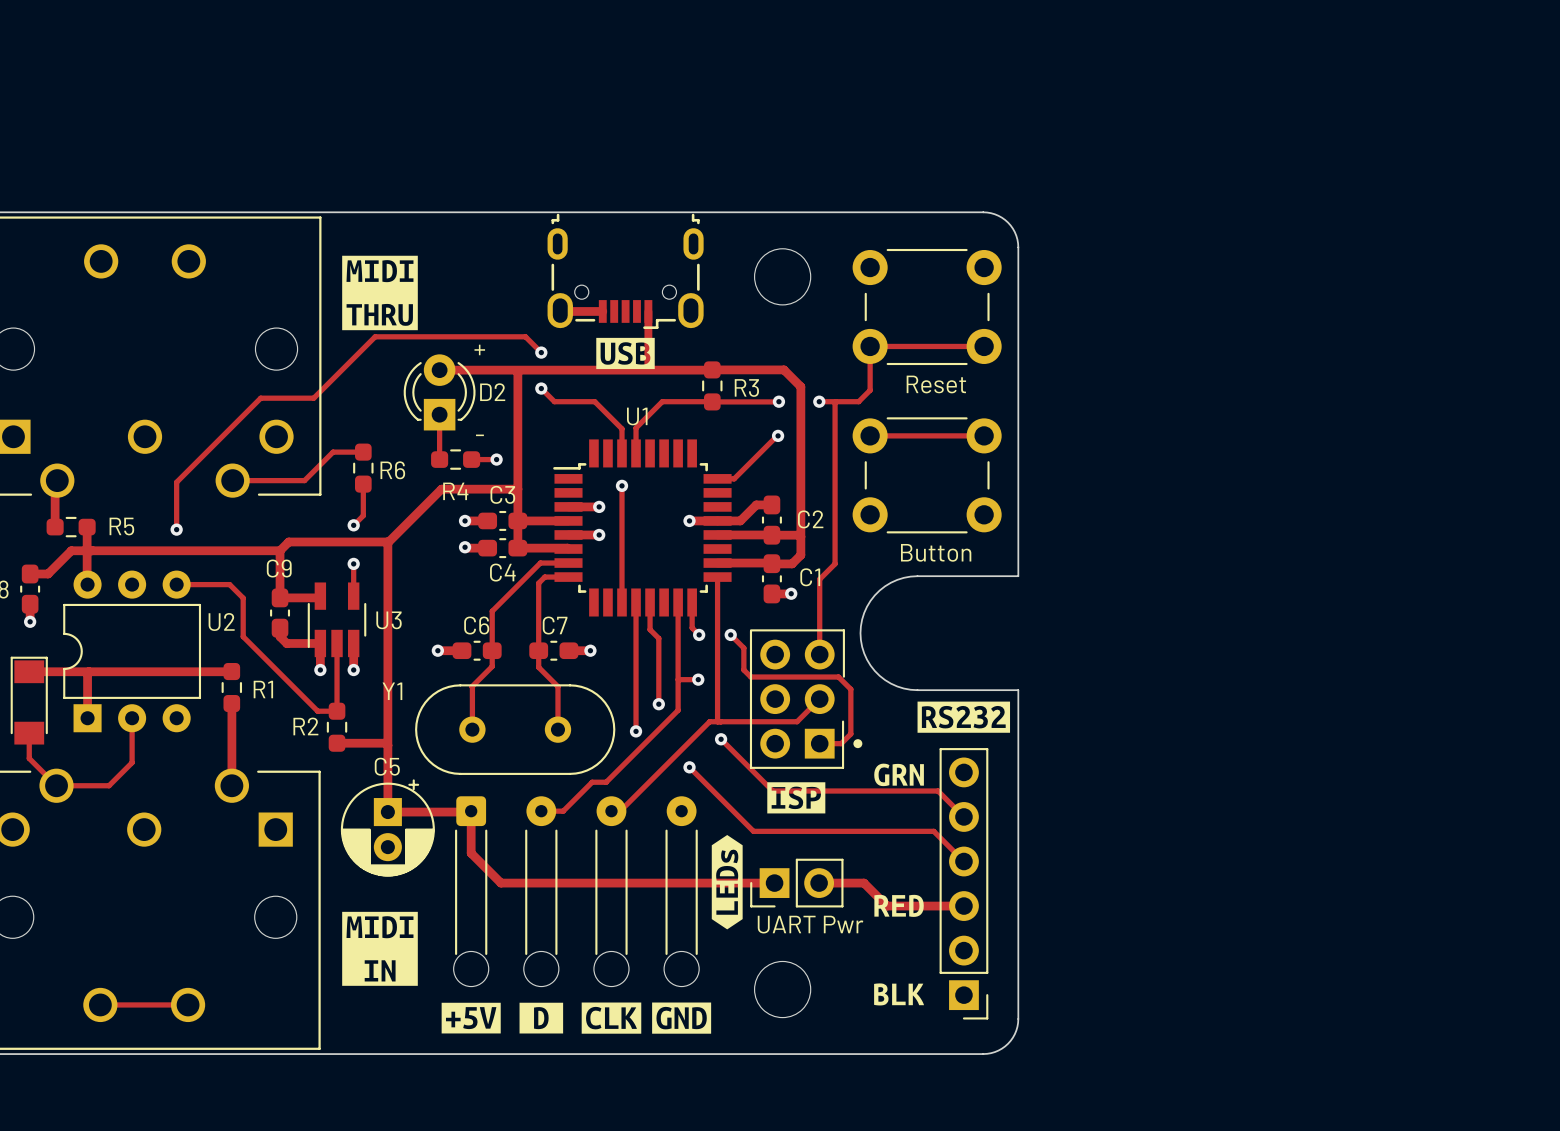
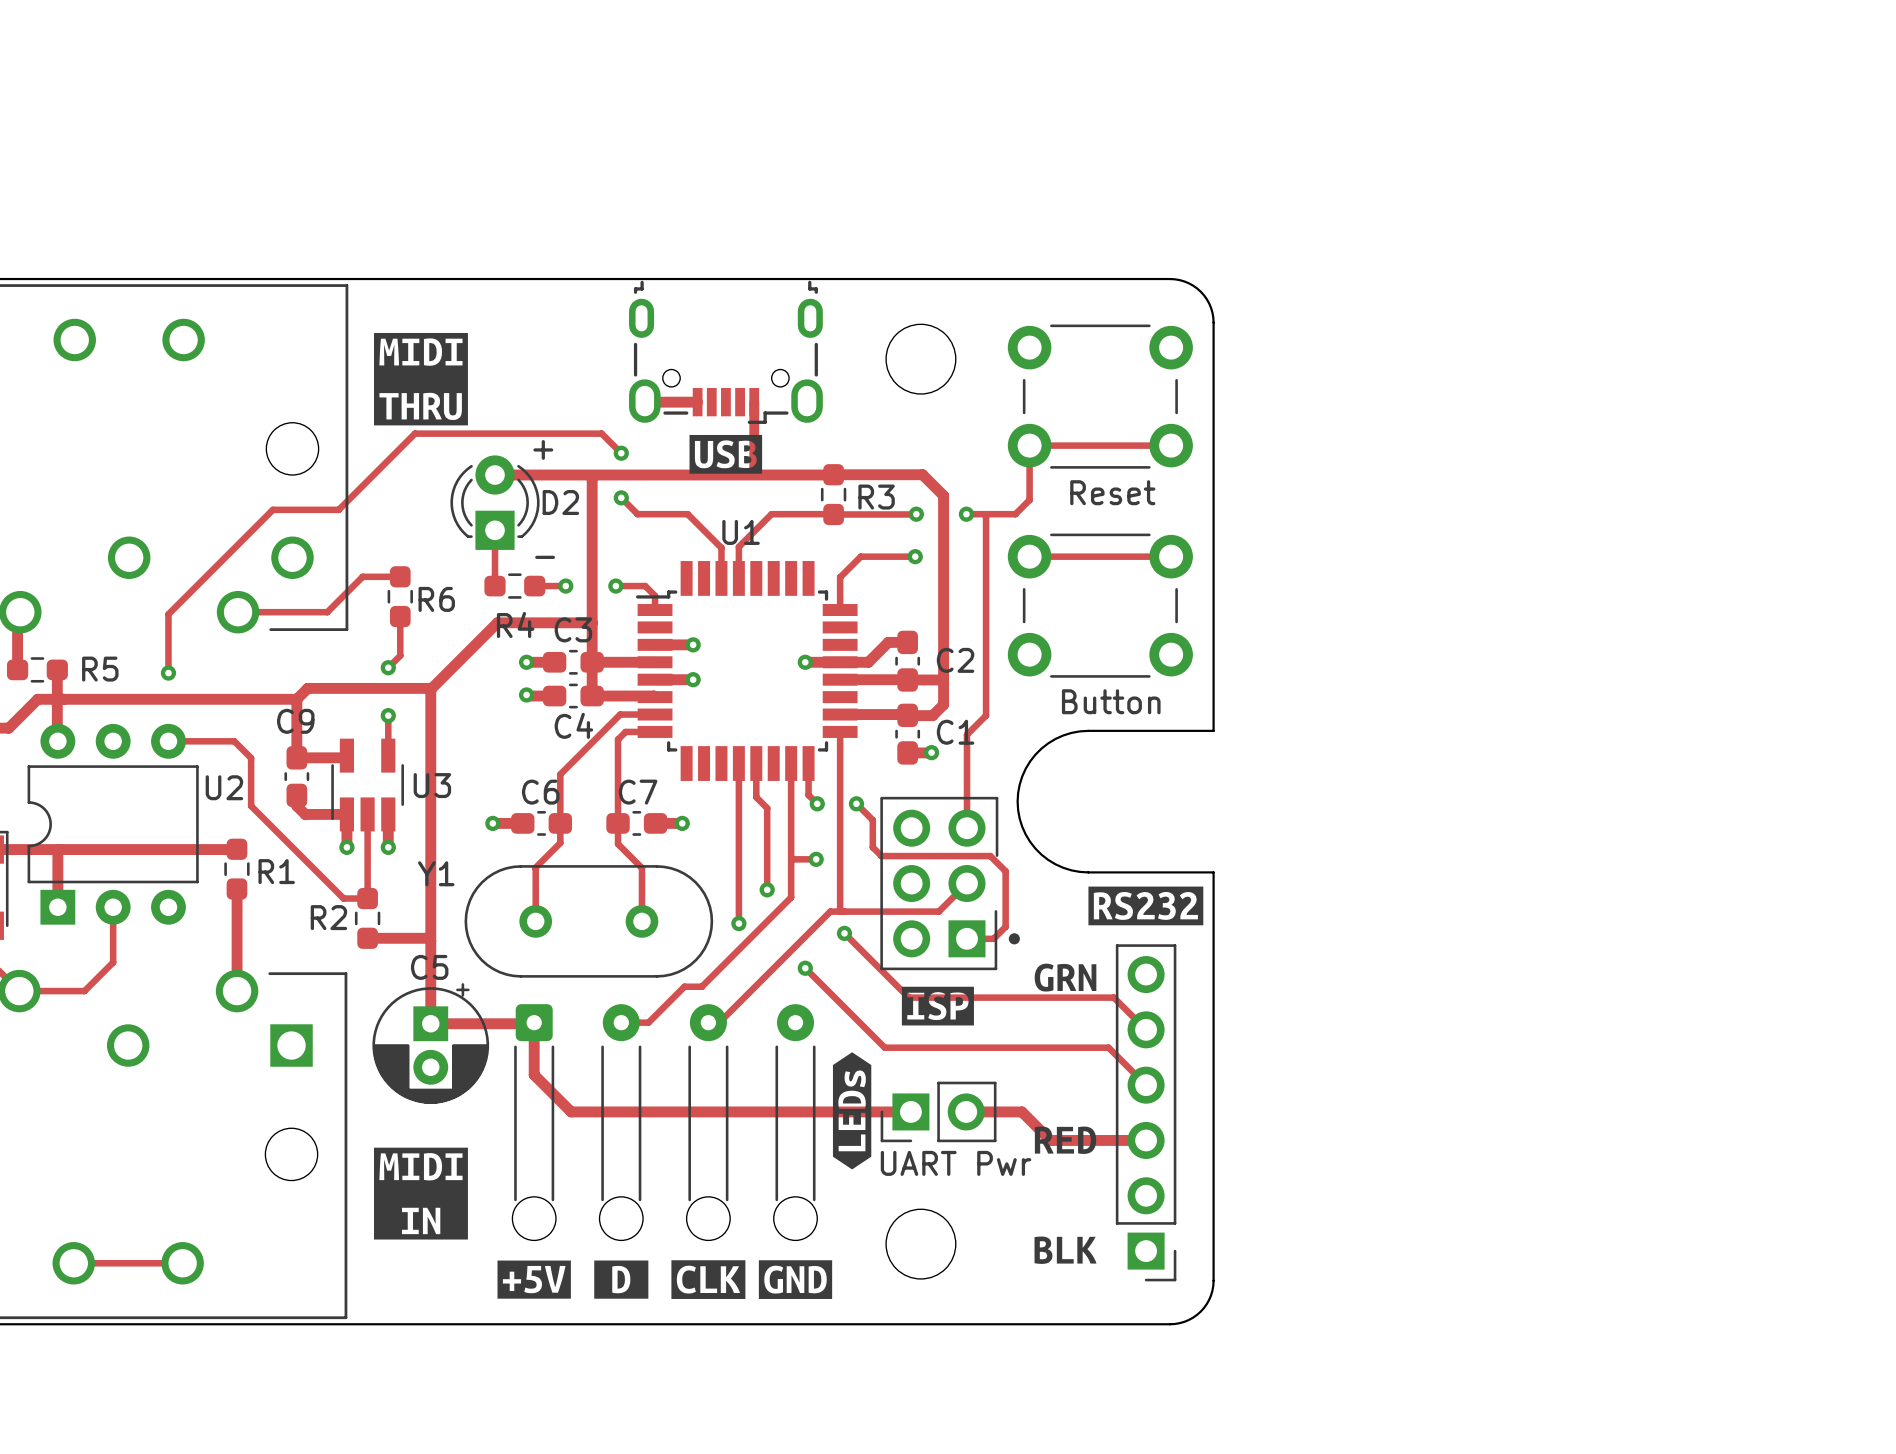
track: (777, 435) (734, 478) (717, 478) -> (914, 556) (860, 556) (840, 577) (840, 610)
track: none -> (615, 586) (645, 586) (655, 595) (655, 610)
track: (621, 485) (621, 602) -> none
via position: (621, 485) -> (615, 586)

